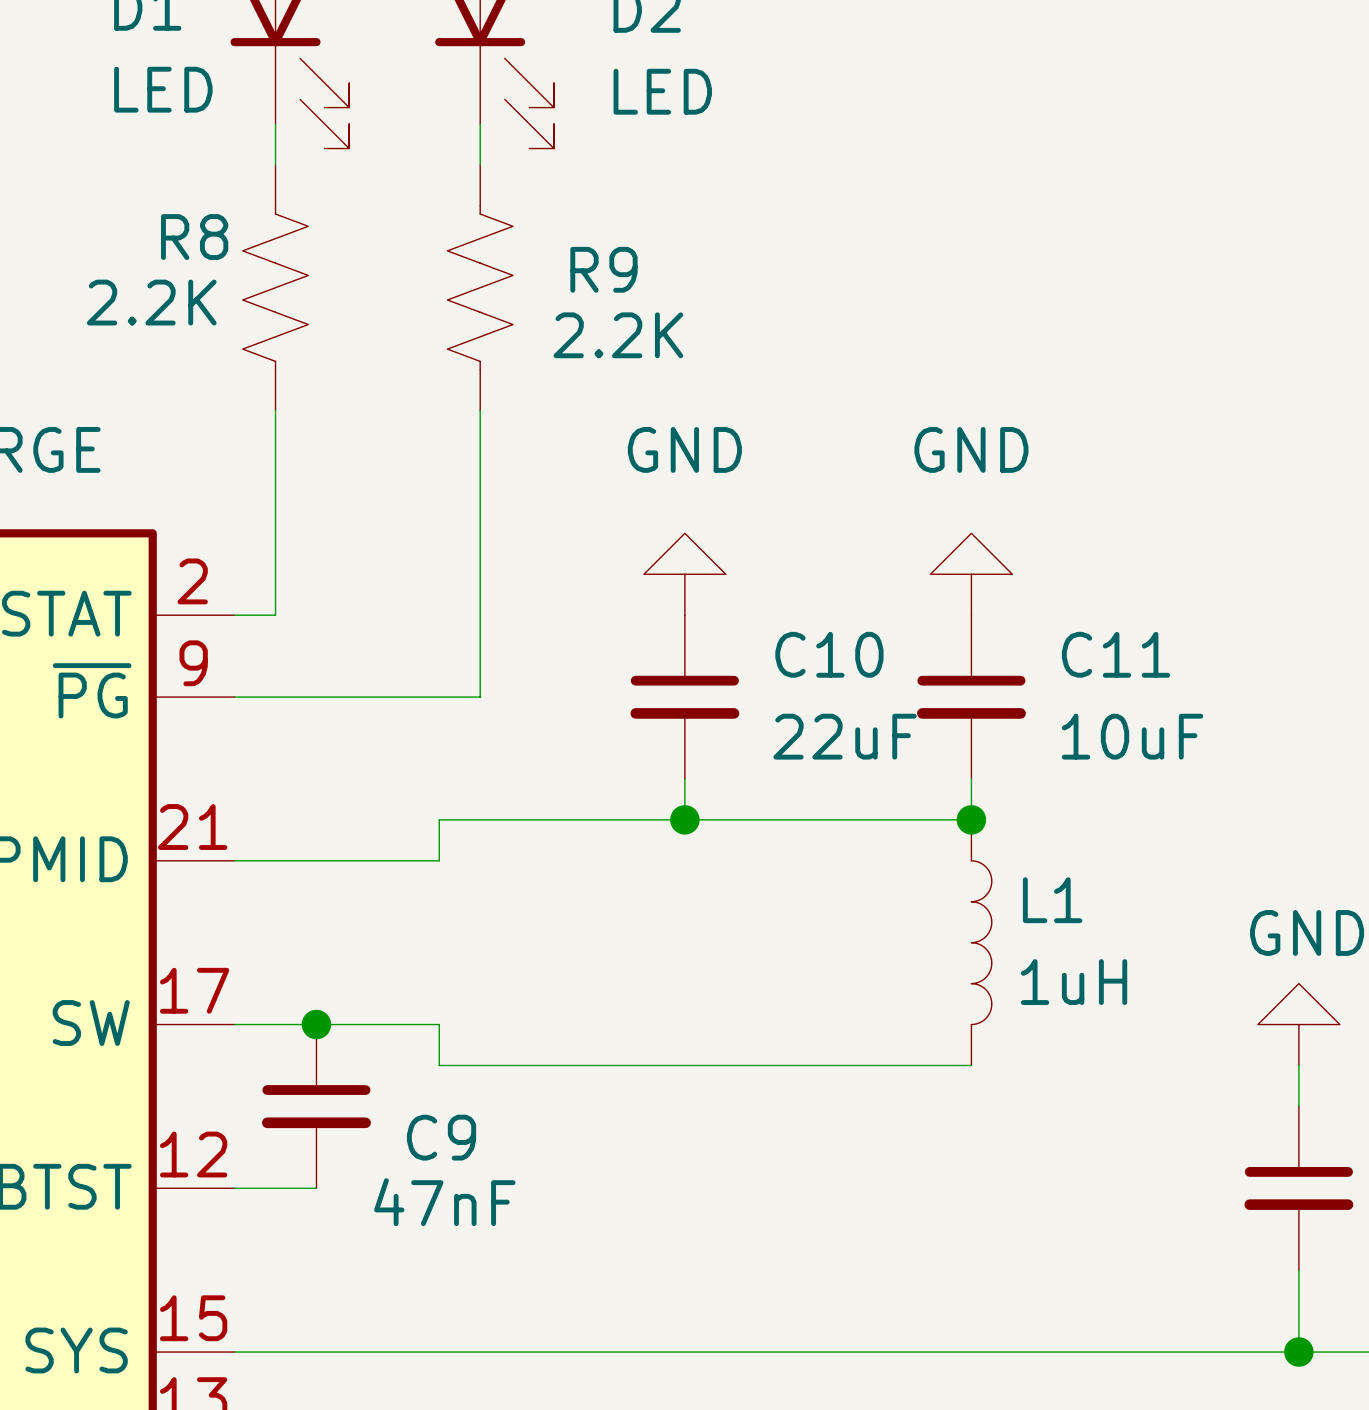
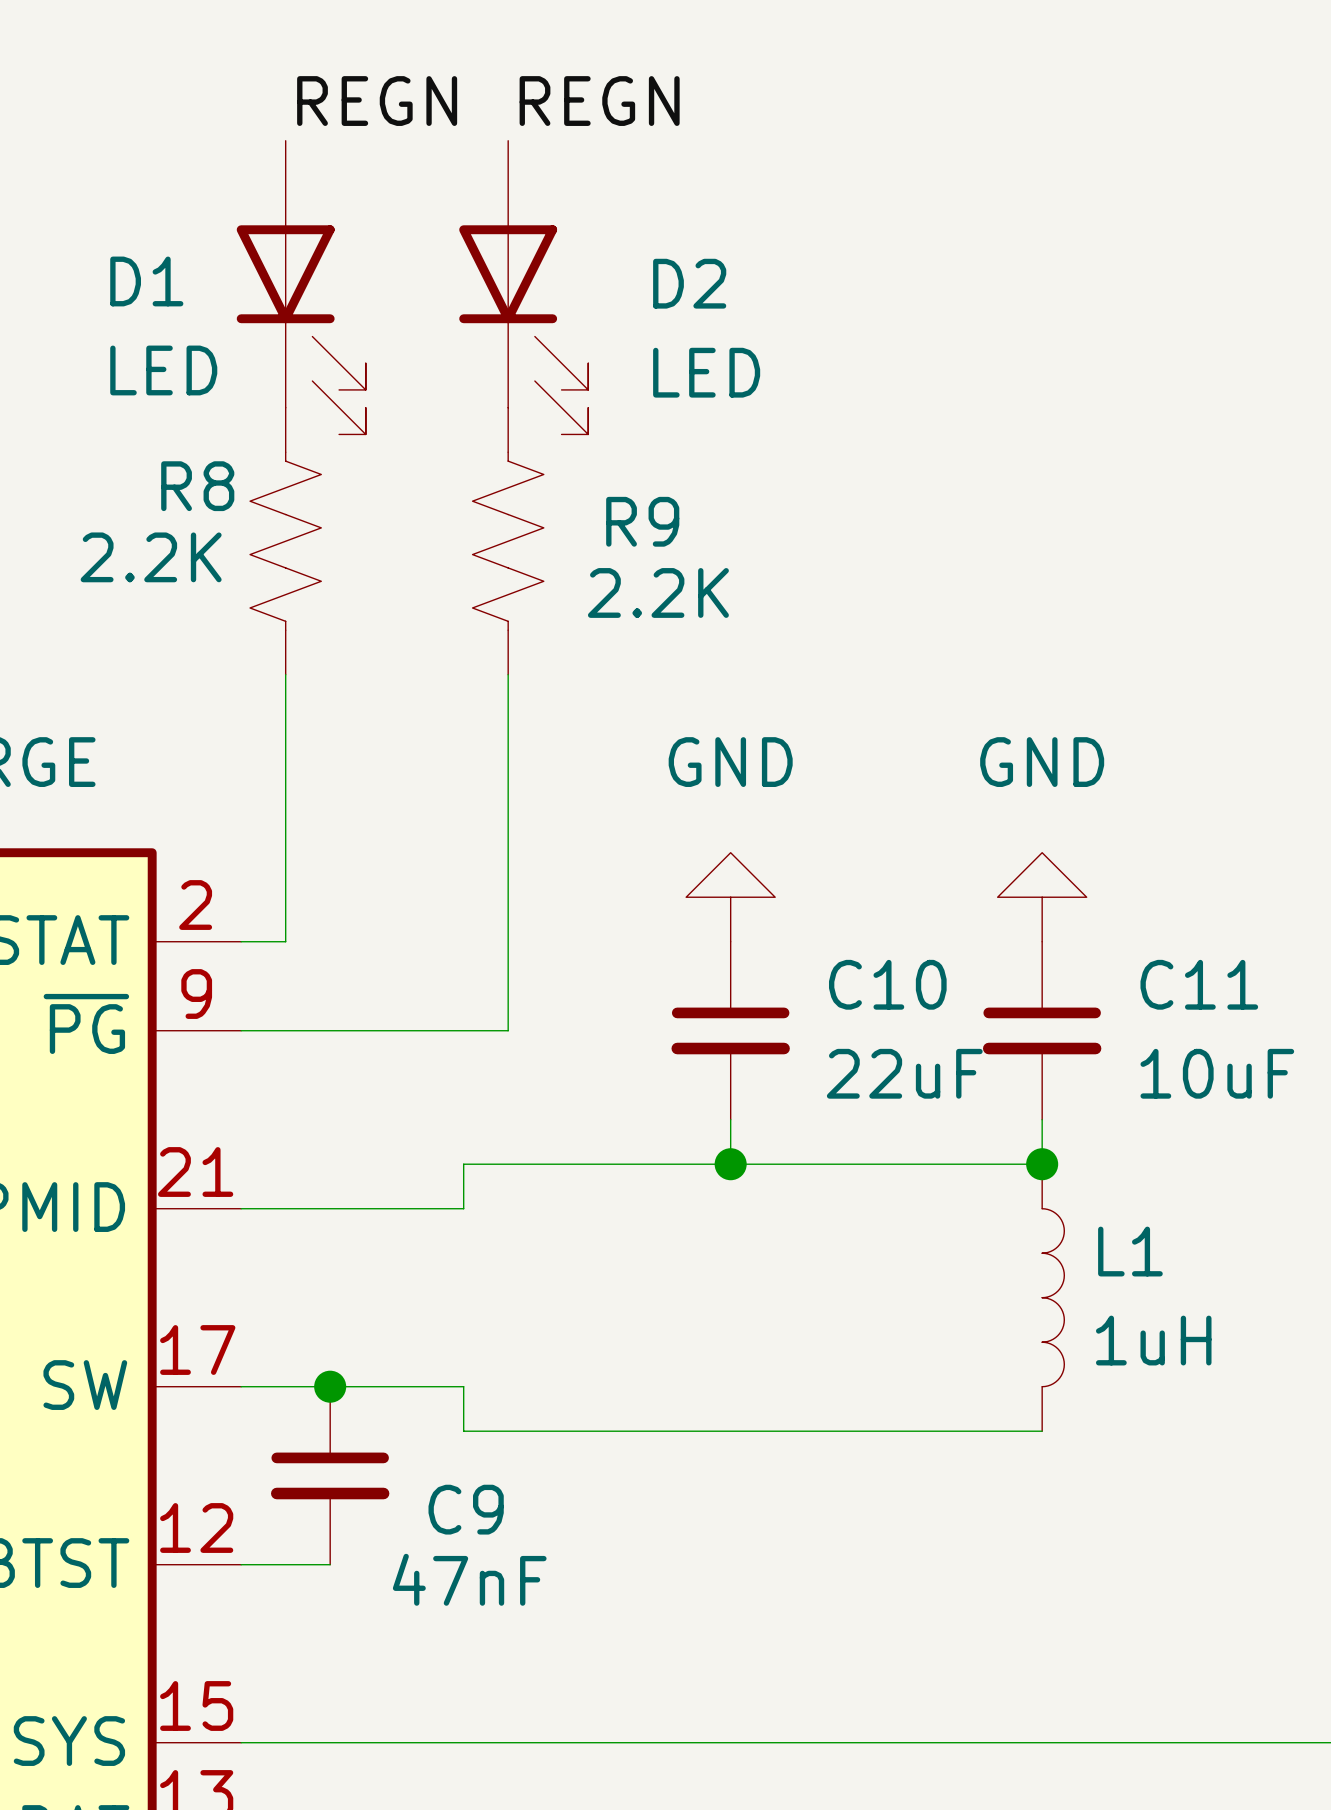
R8 position: (275, 287) -> (285, 541)
R9 position: (480, 287) -> (508, 541)

